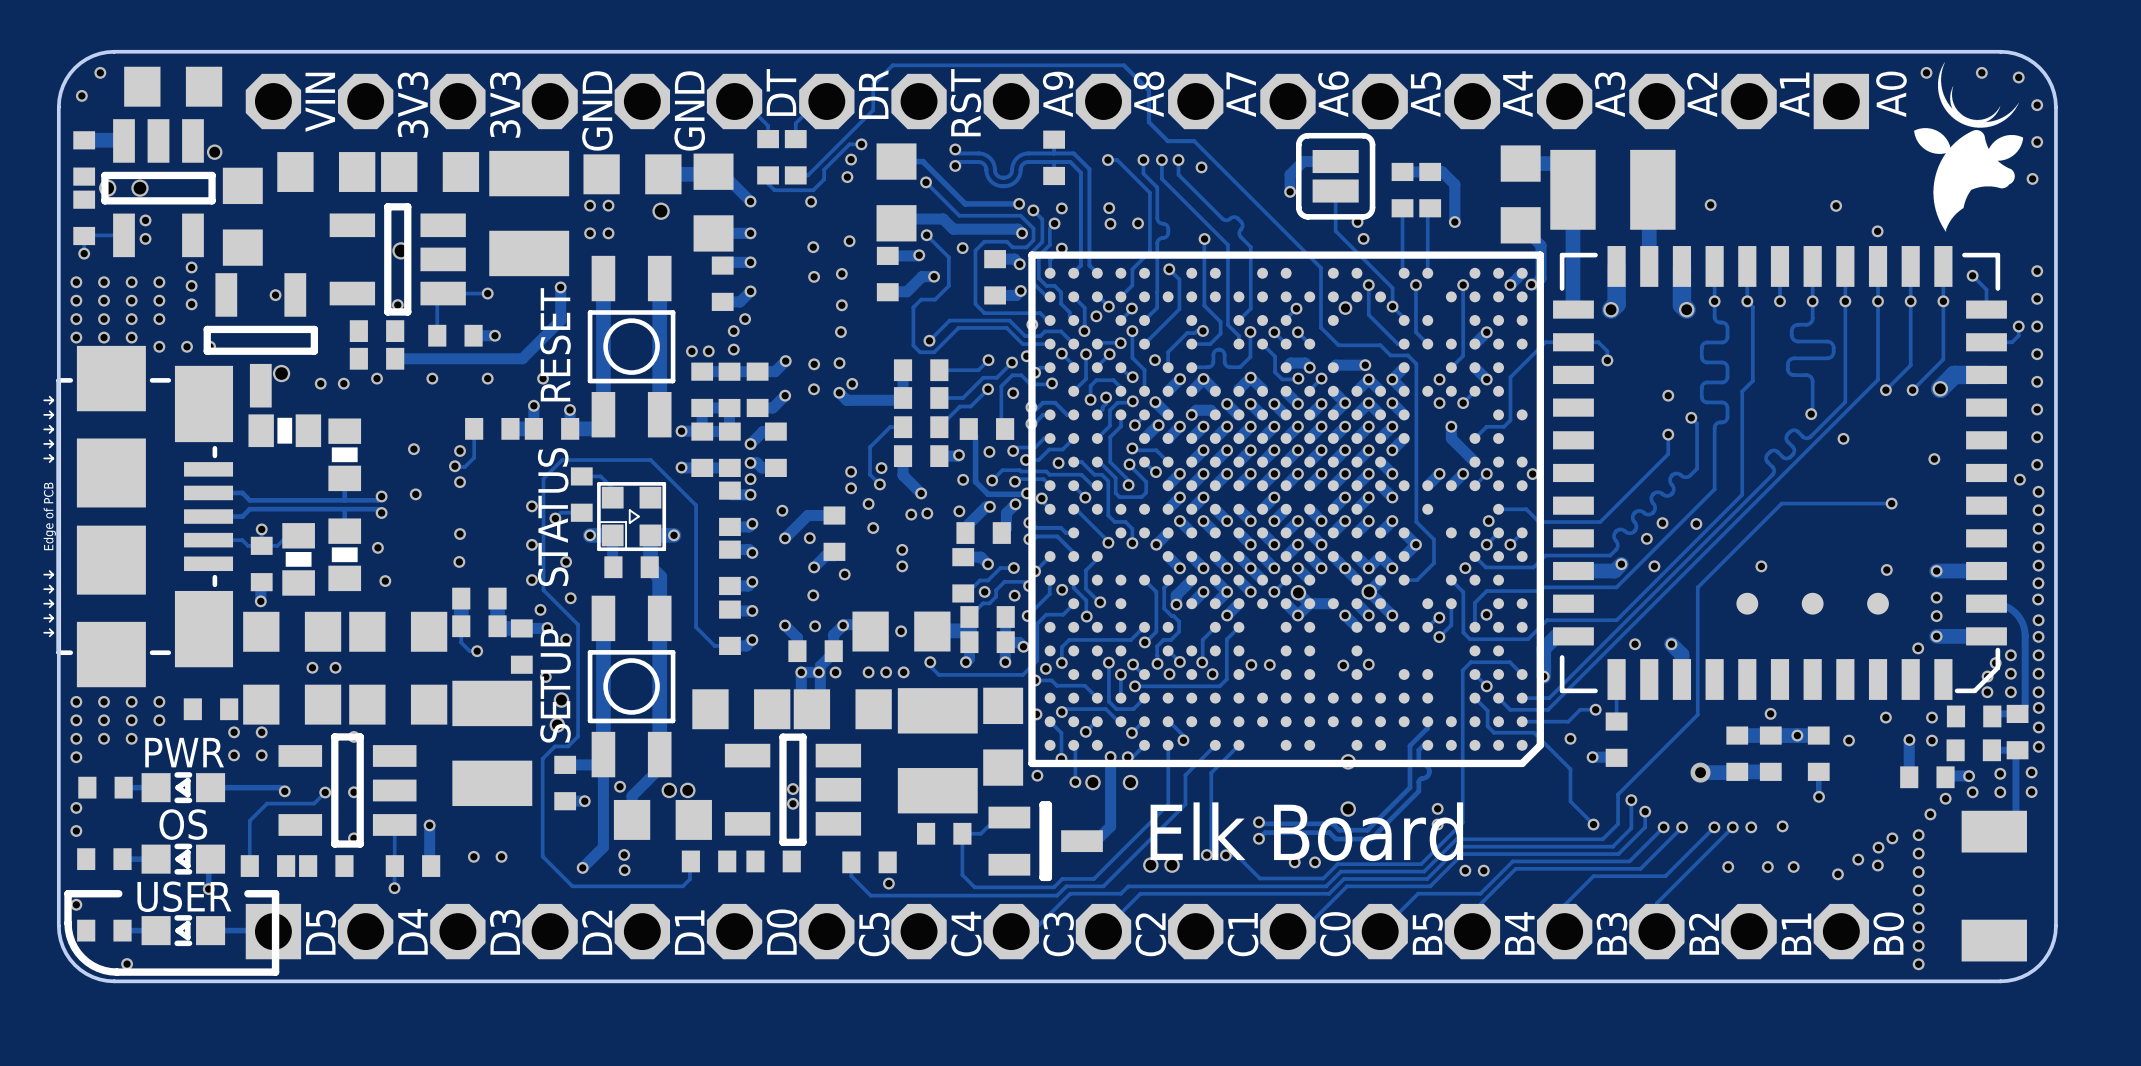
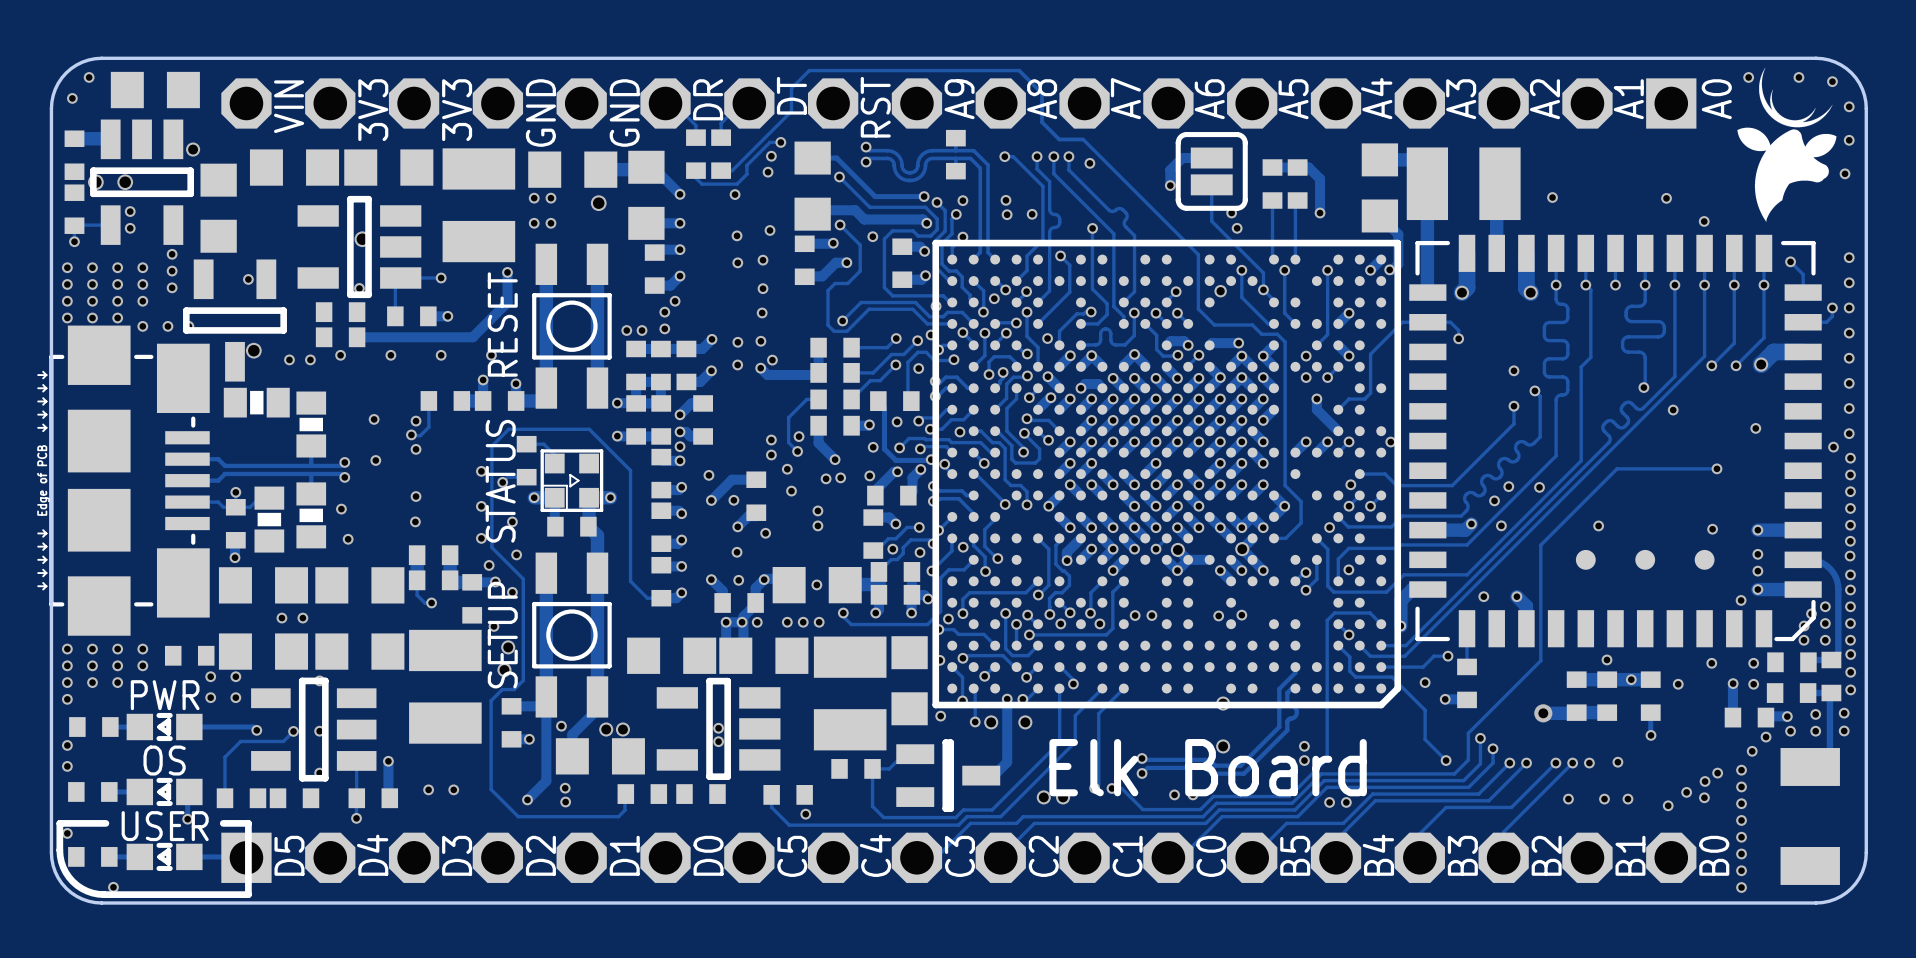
text: DT (781, 92) -> DR (708, 99)
text: DR (873, 94) -> DT (791, 95)

